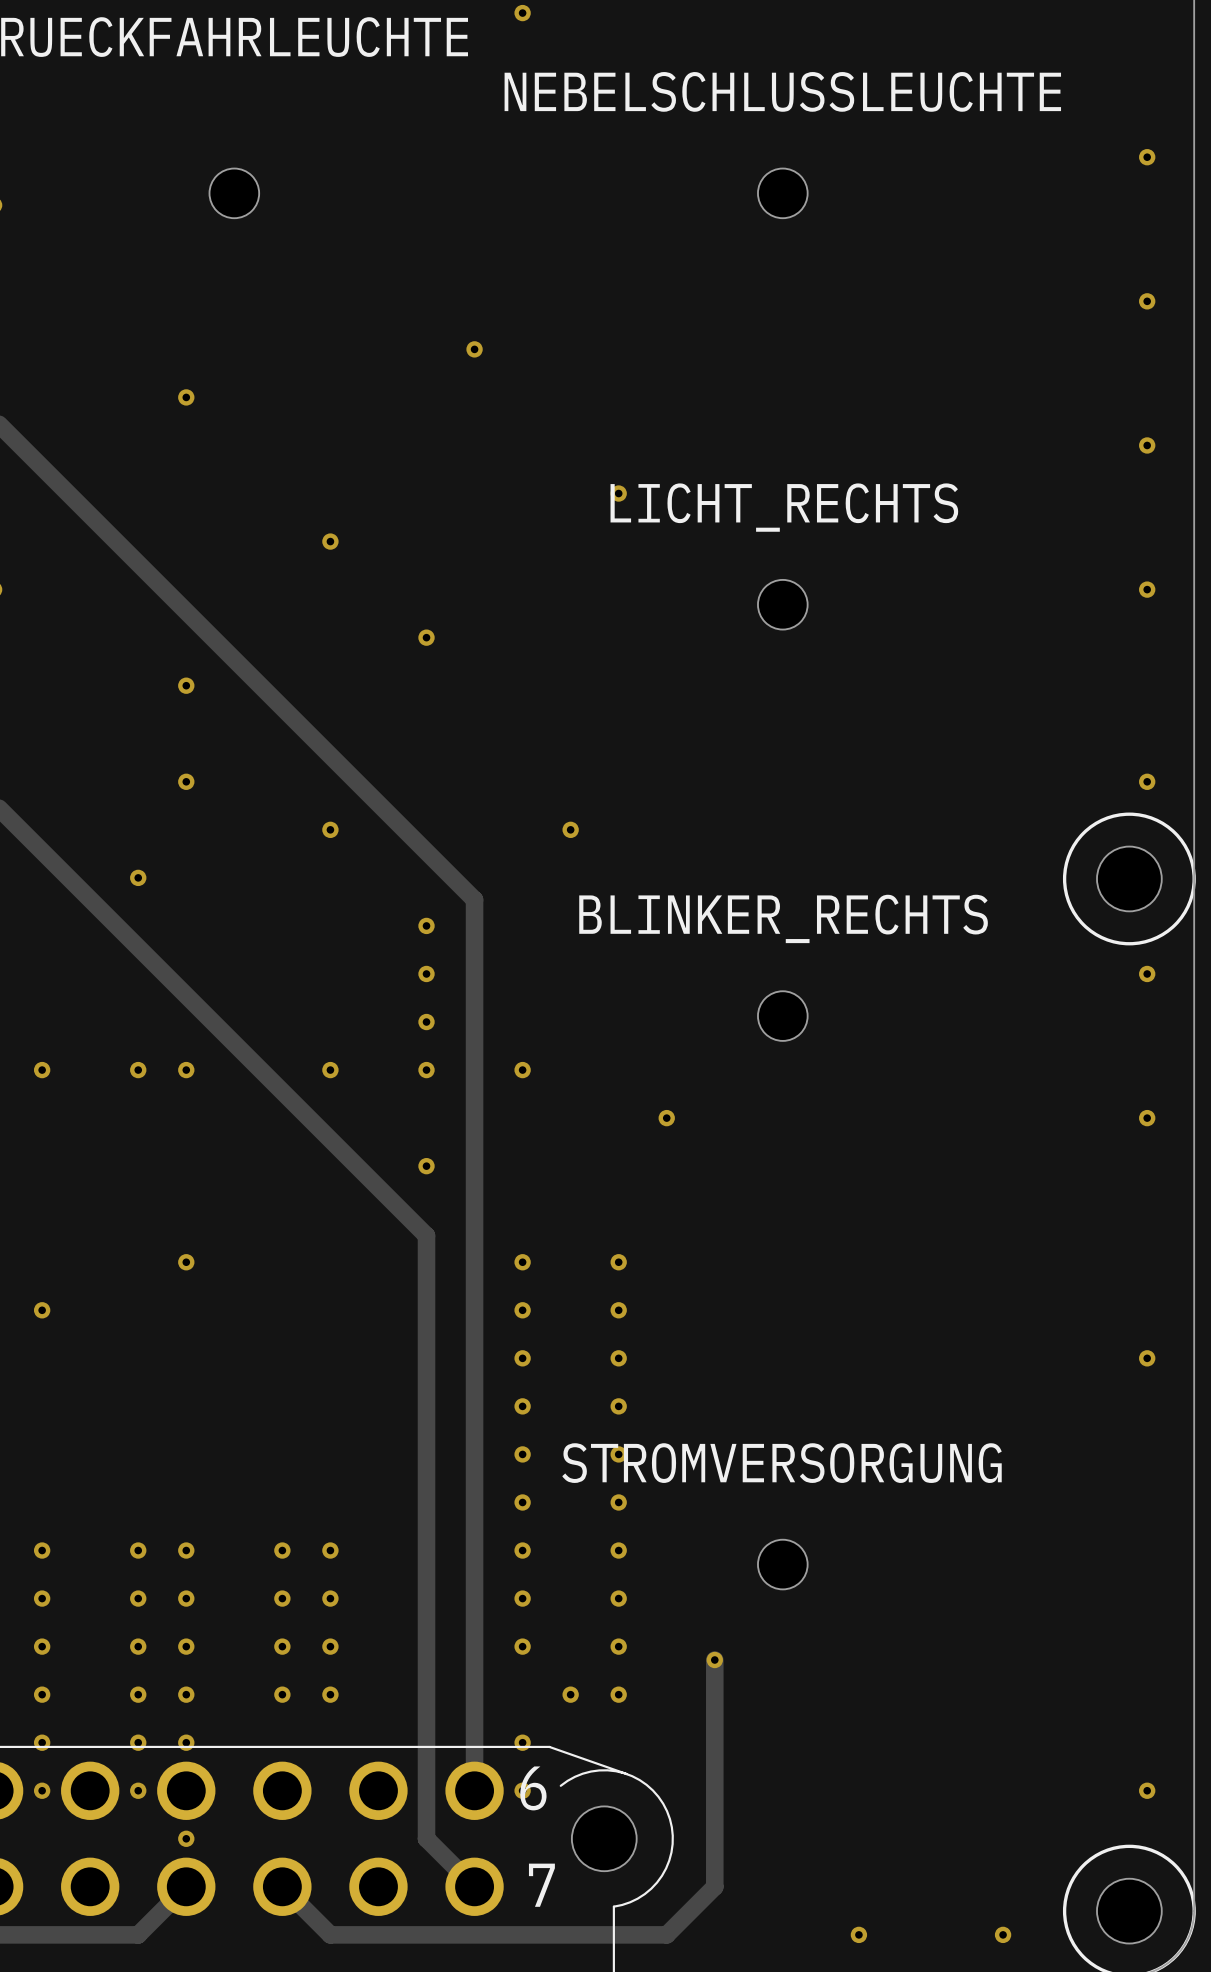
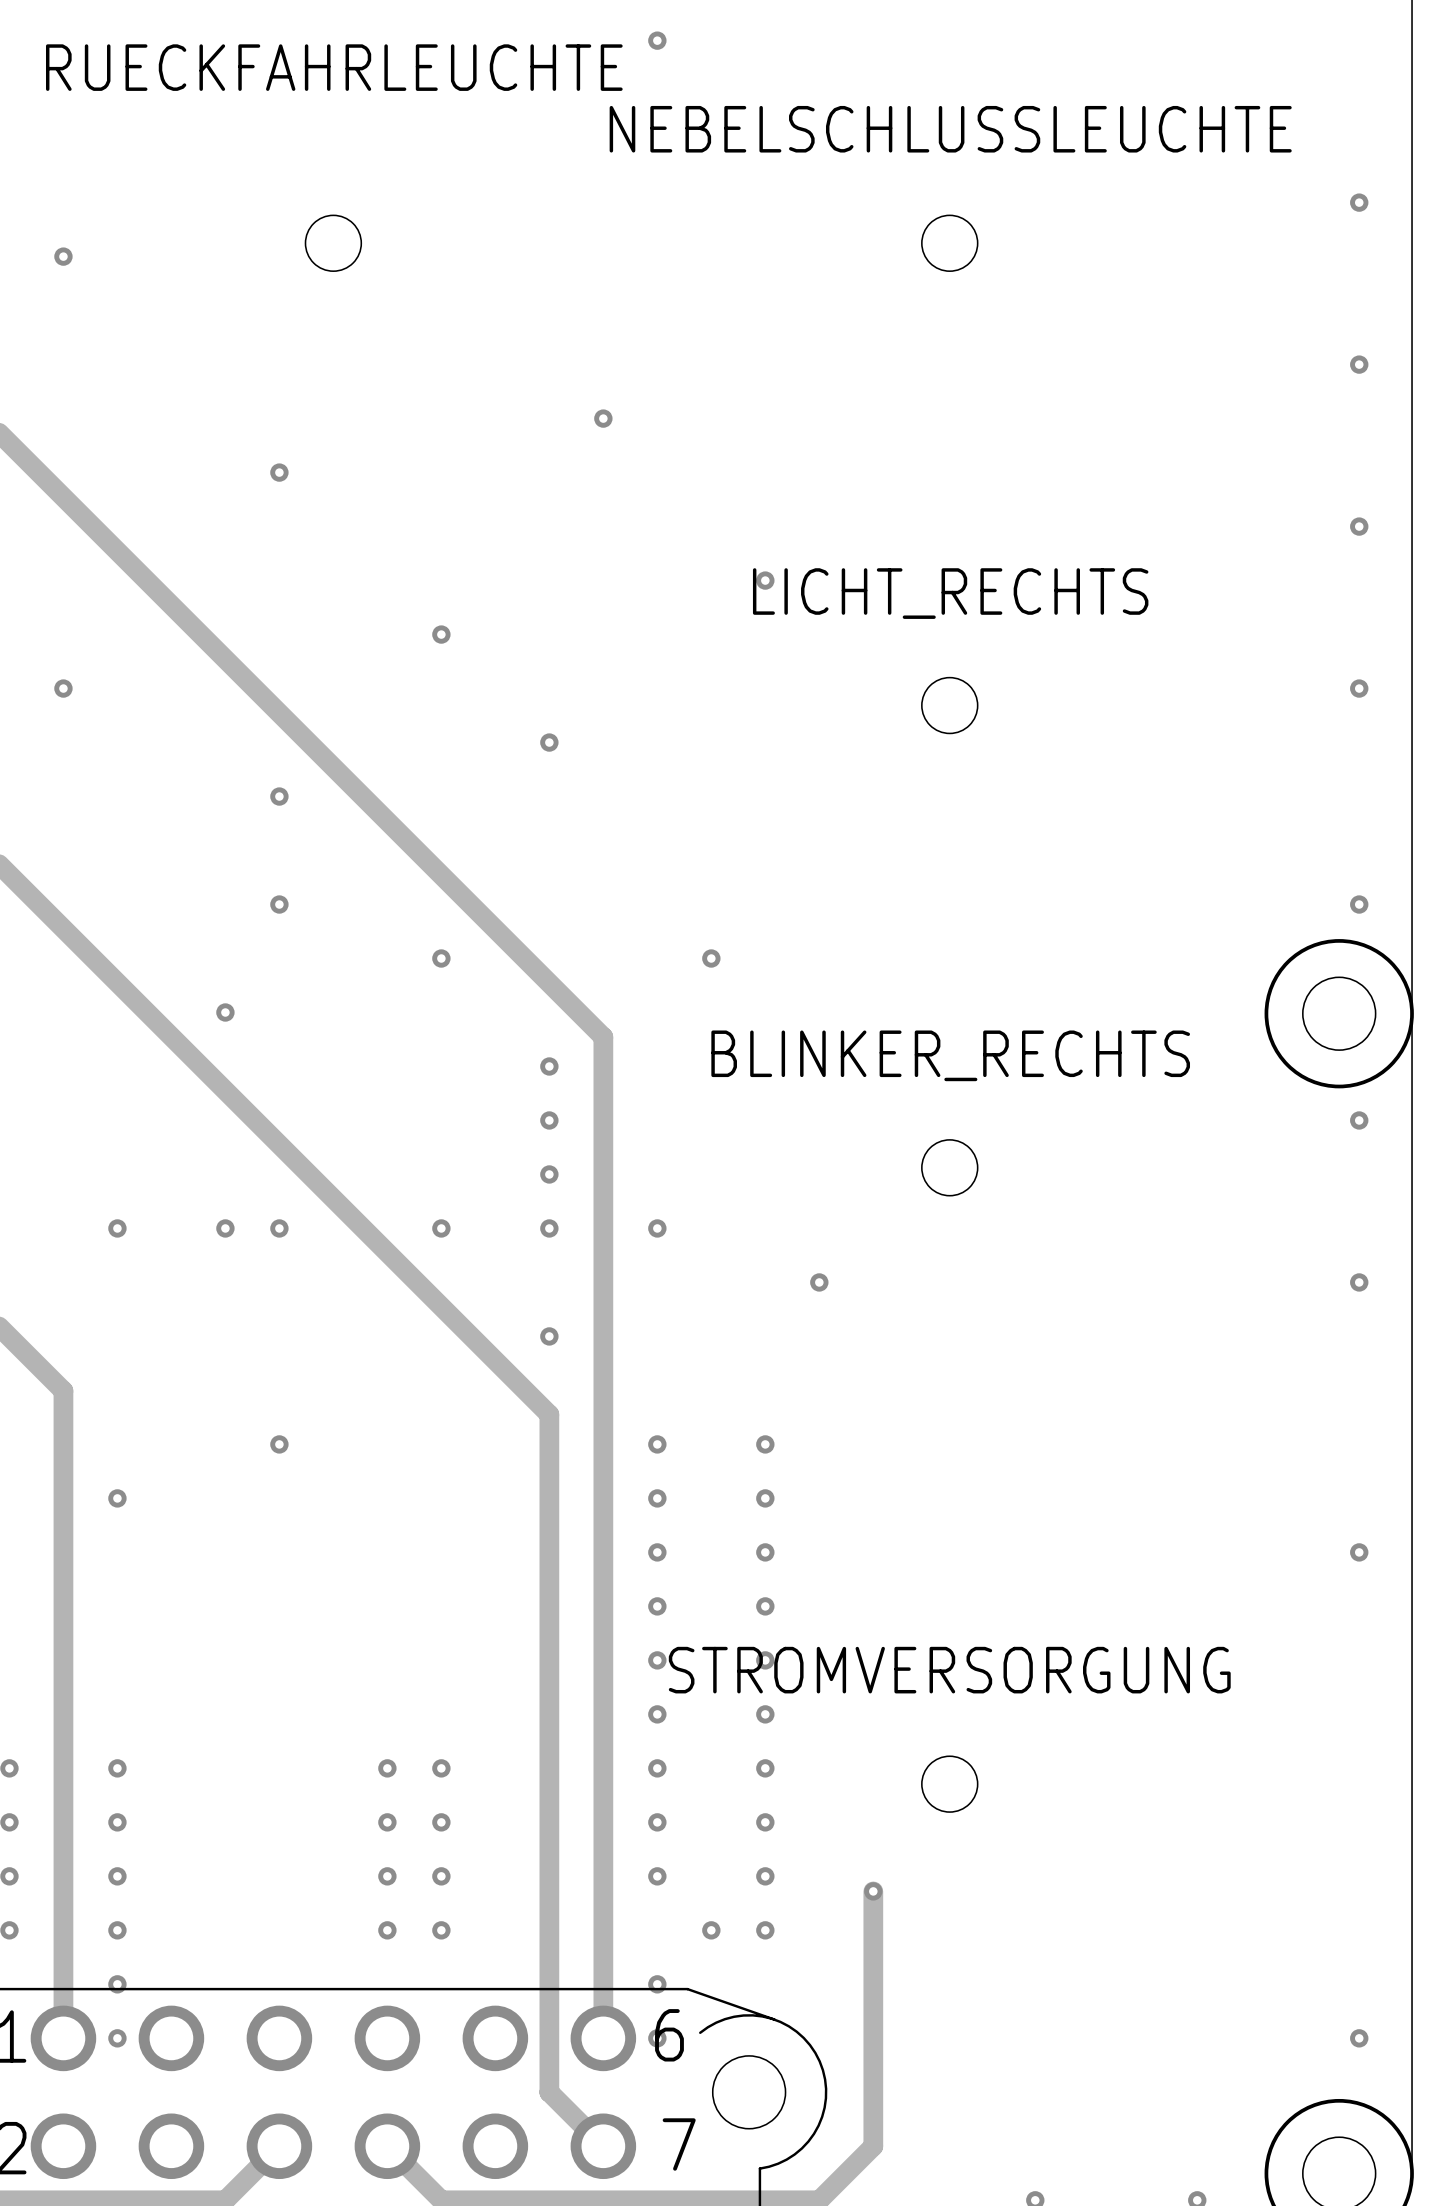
via: (138, 1550) -> none
via: (186, 1550) -> none
via: (138, 1598) -> none
via: (186, 1598) -> none
via: (138, 1646) -> none
via: (186, 1646) -> none
via: (138, 1694) -> none
via: (186, 1694) -> none
via: (138, 1742) -> none
via: (186, 1742) -> none
via: (138, 1790) -> none
via: (186, 1838) -> none

